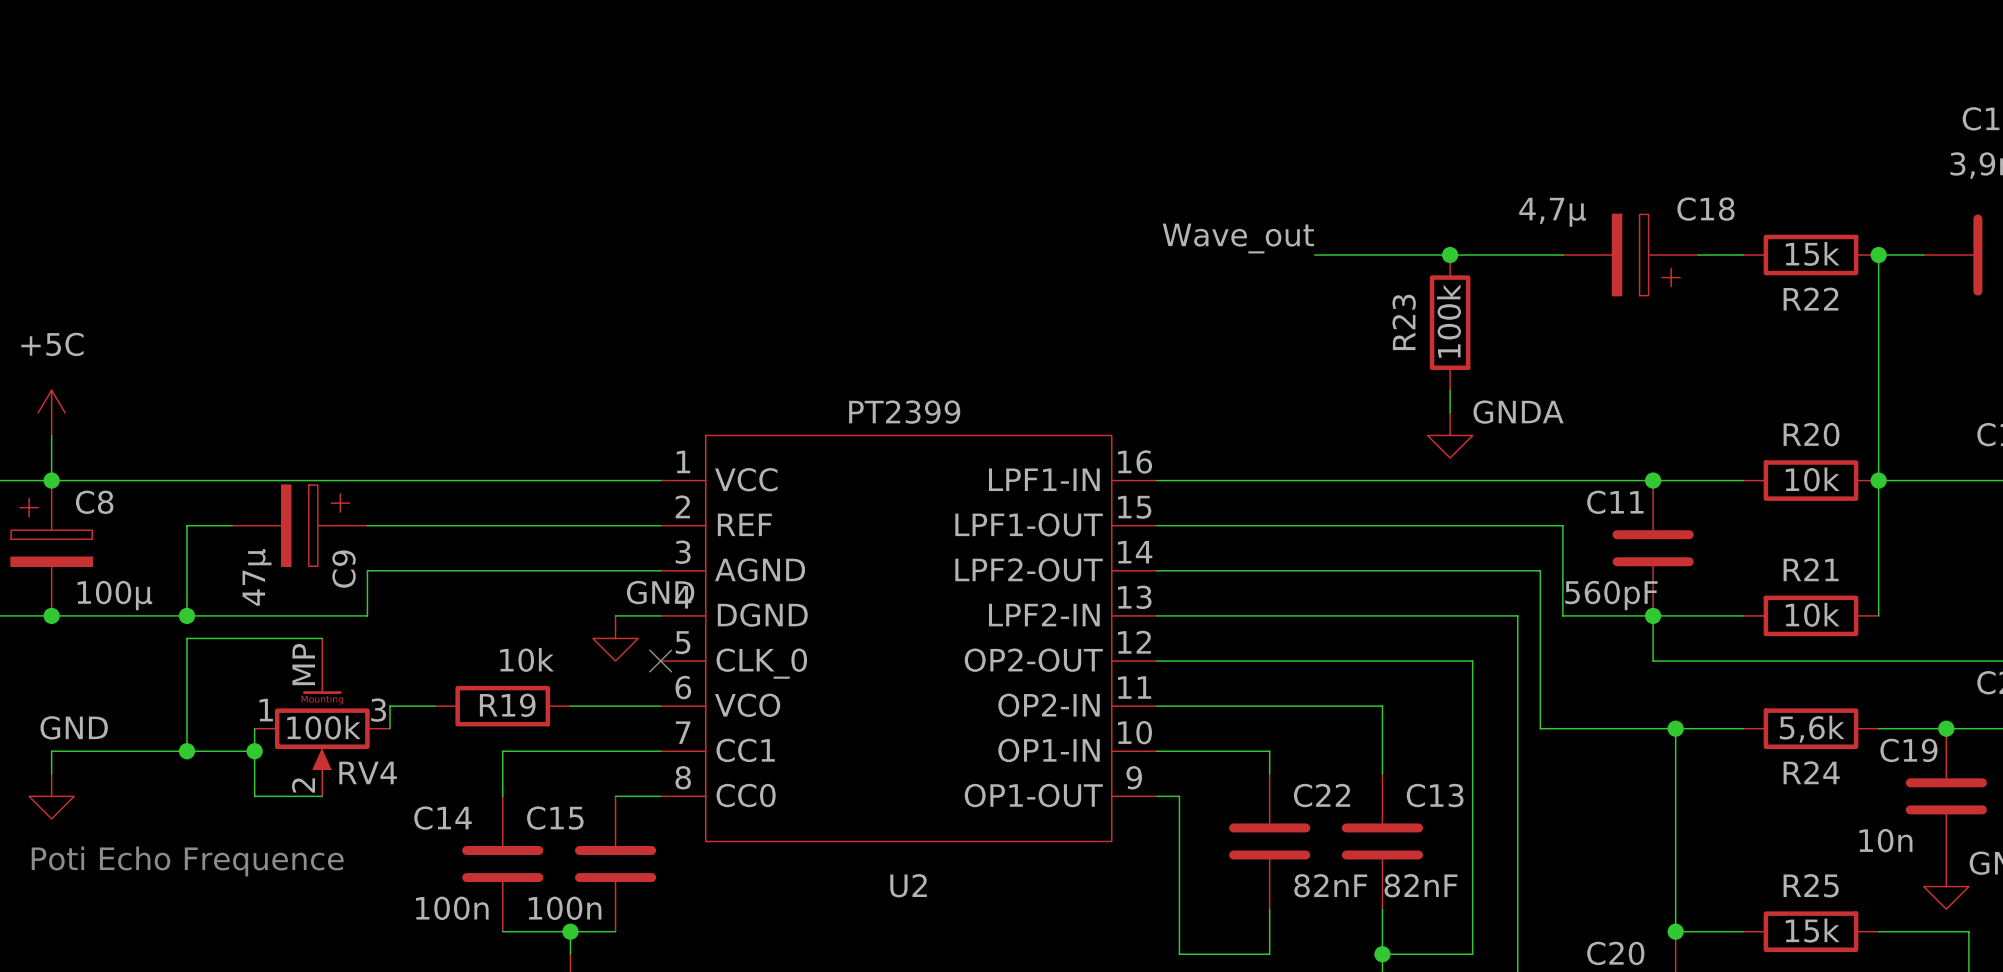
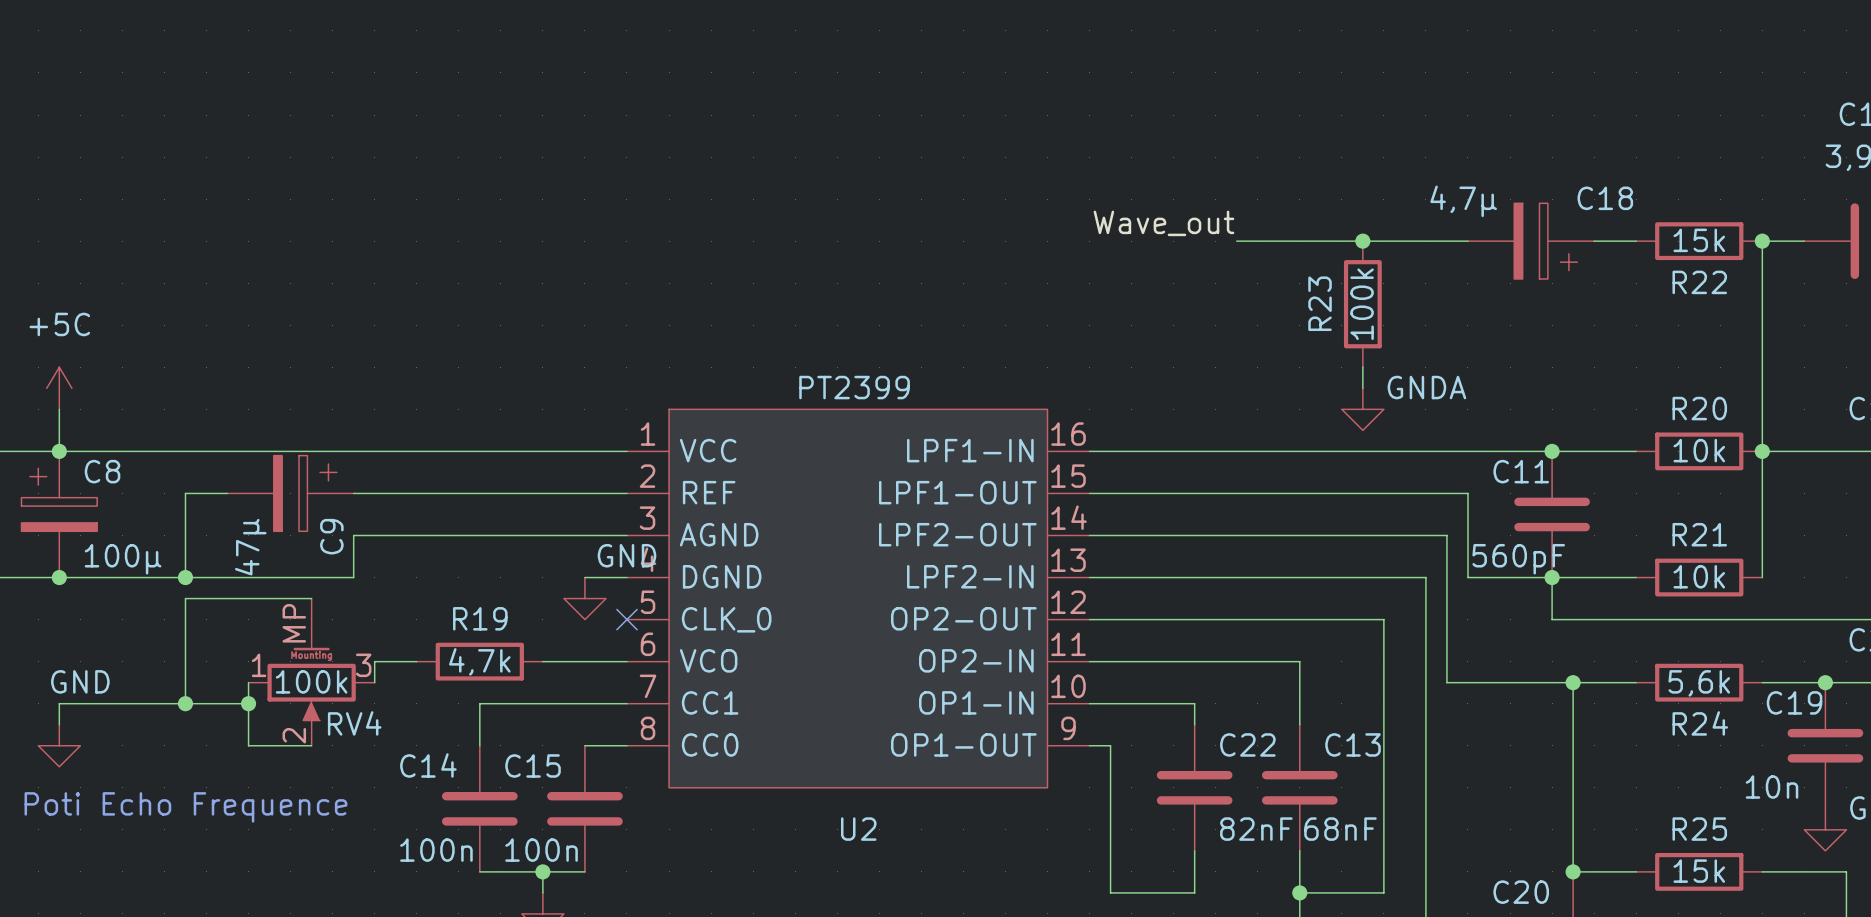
R19 value: 10k (526, 659) -> 4,7k (479, 661)
R19 name position: R19 (507, 705) -> R19 (480, 618)
C13 value: 82nF (1420, 885) -> 68nF (1340, 829)

